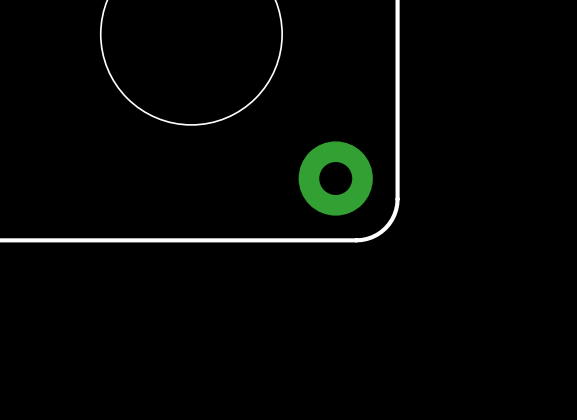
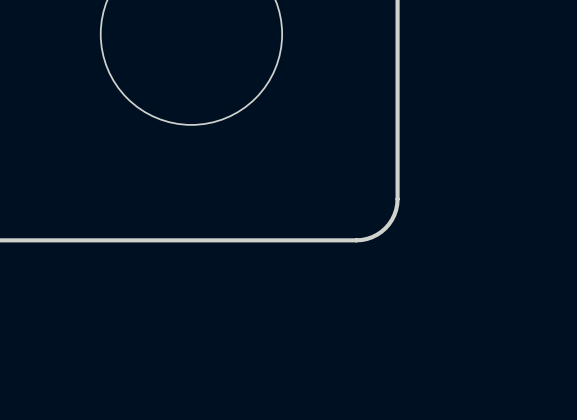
via: (335, 178) -> none

